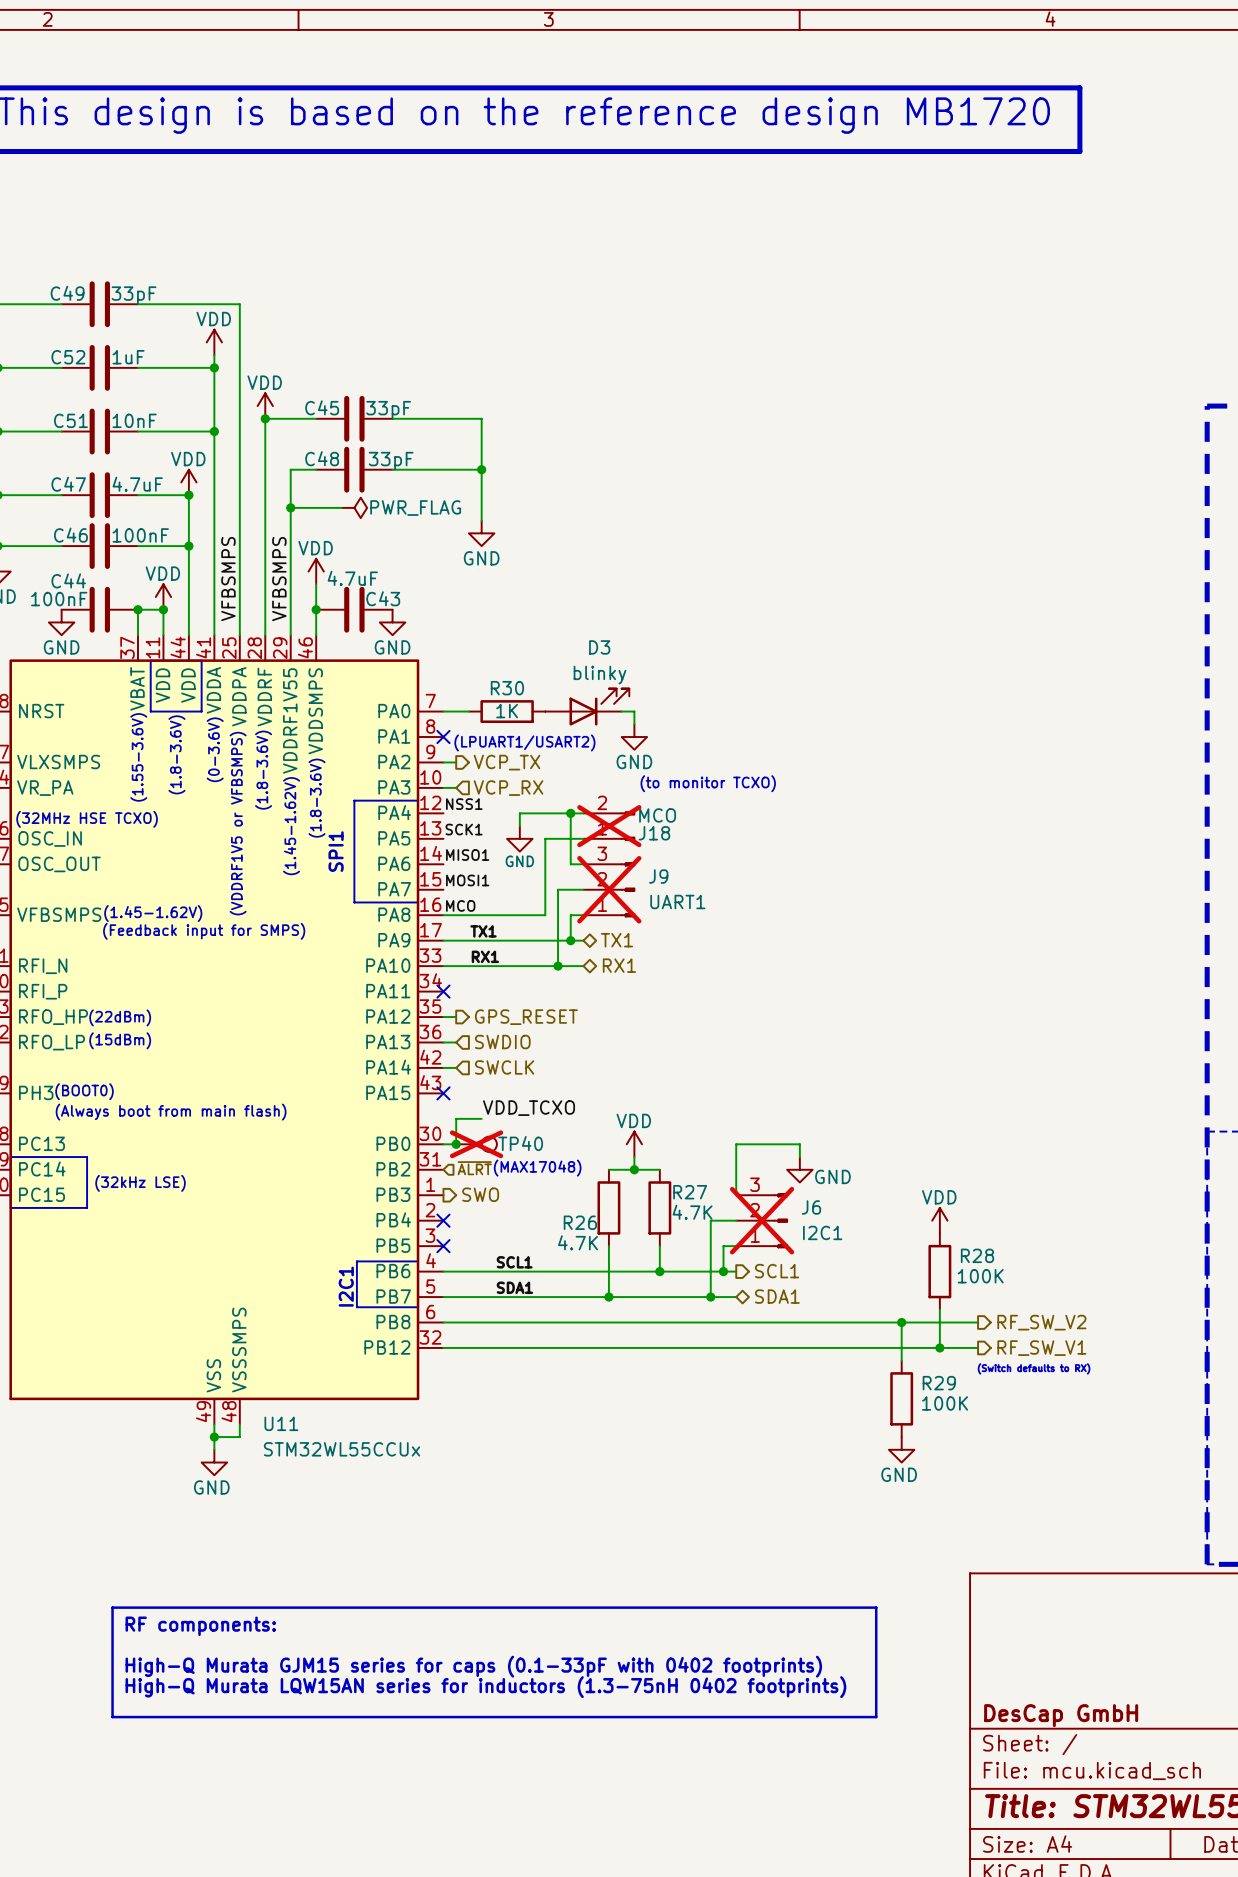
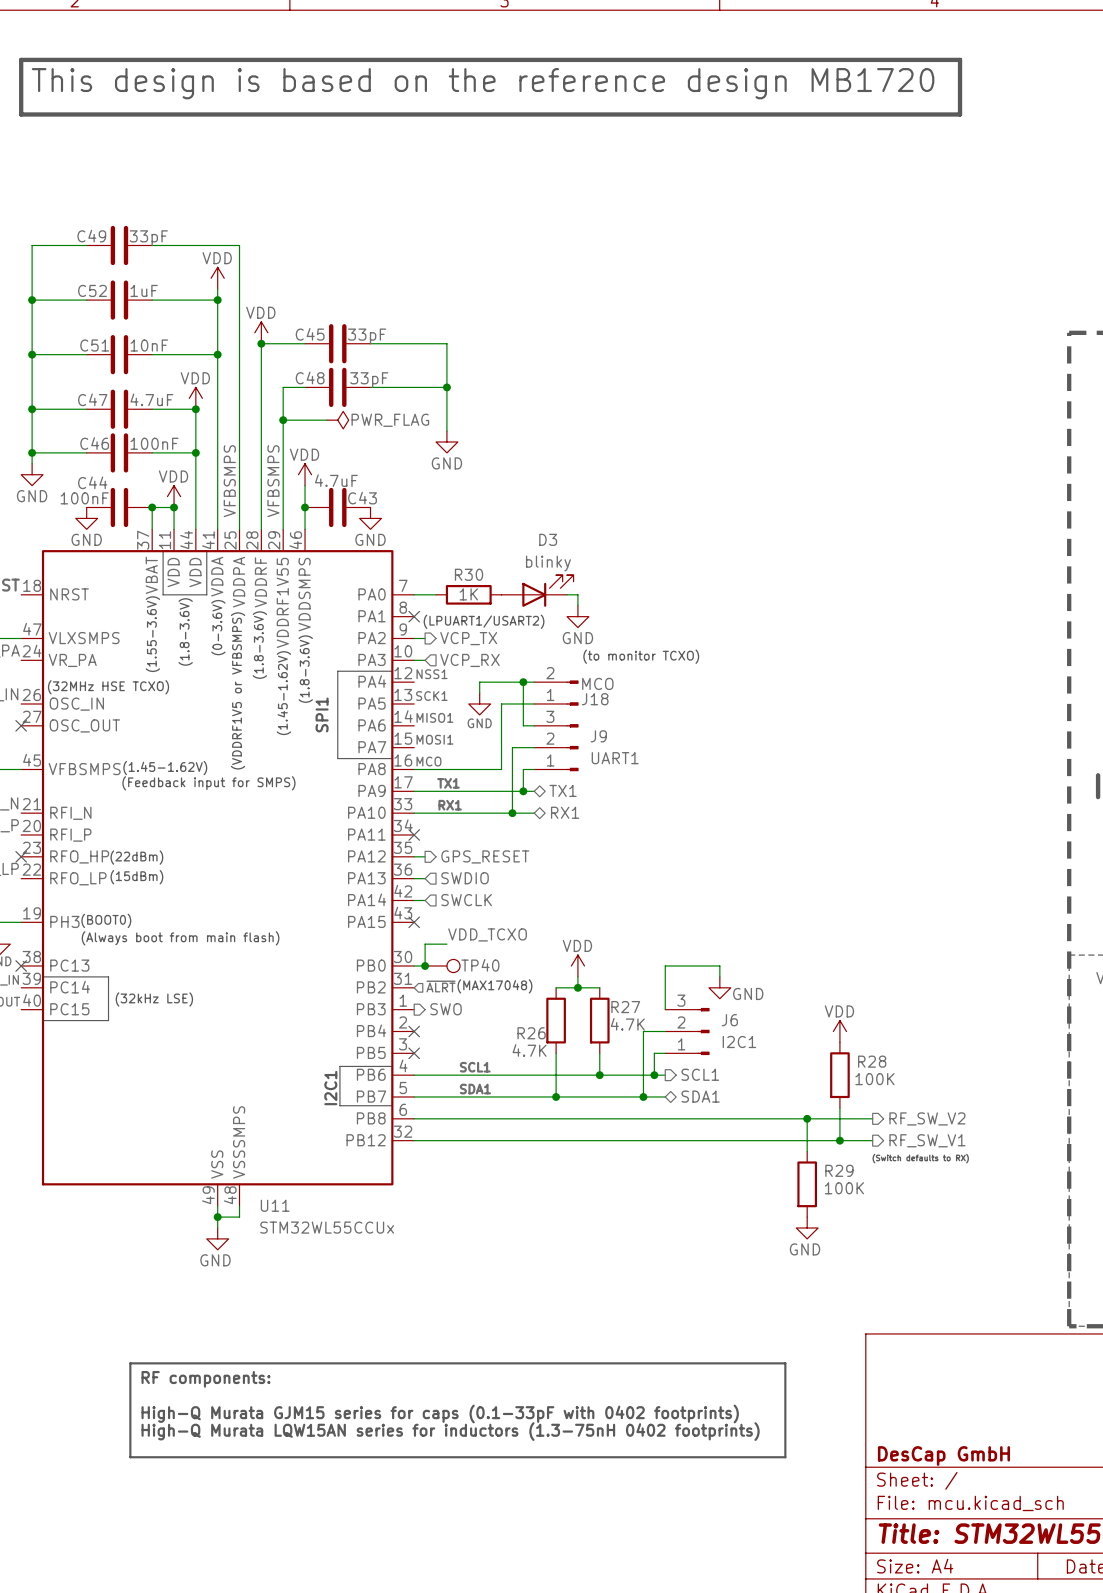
J18 do-not-place cross: (609, 826) -> none
J9 do-not-place cross: (609, 889) -> none
TP40 do-not-place cross: (476, 1144) -> none
J6 do-not-place cross: (762, 1220) -> none

